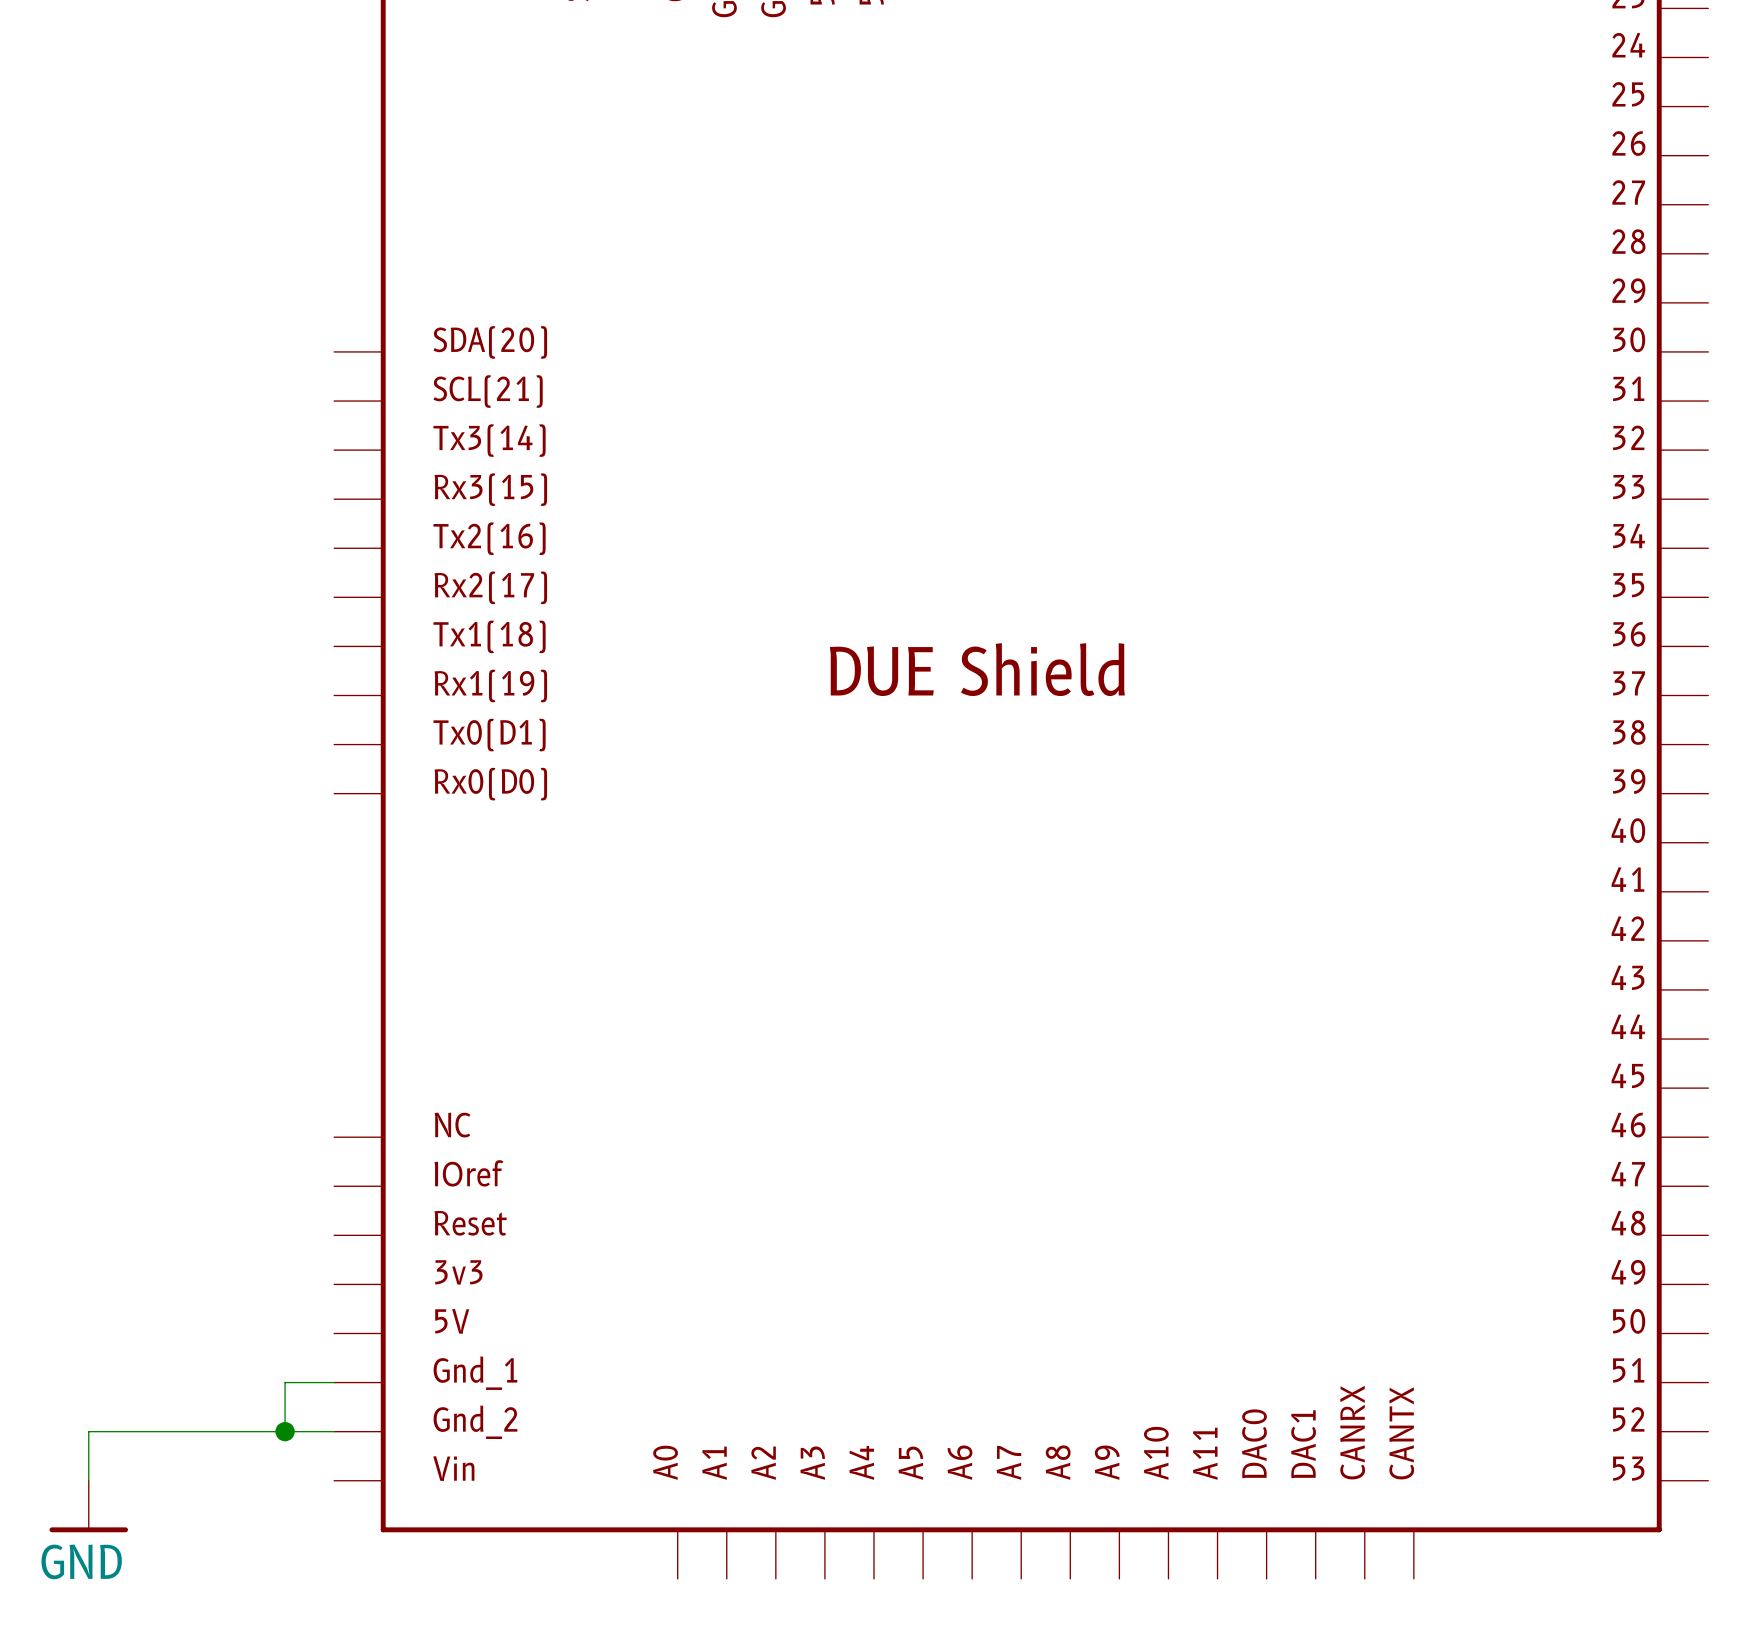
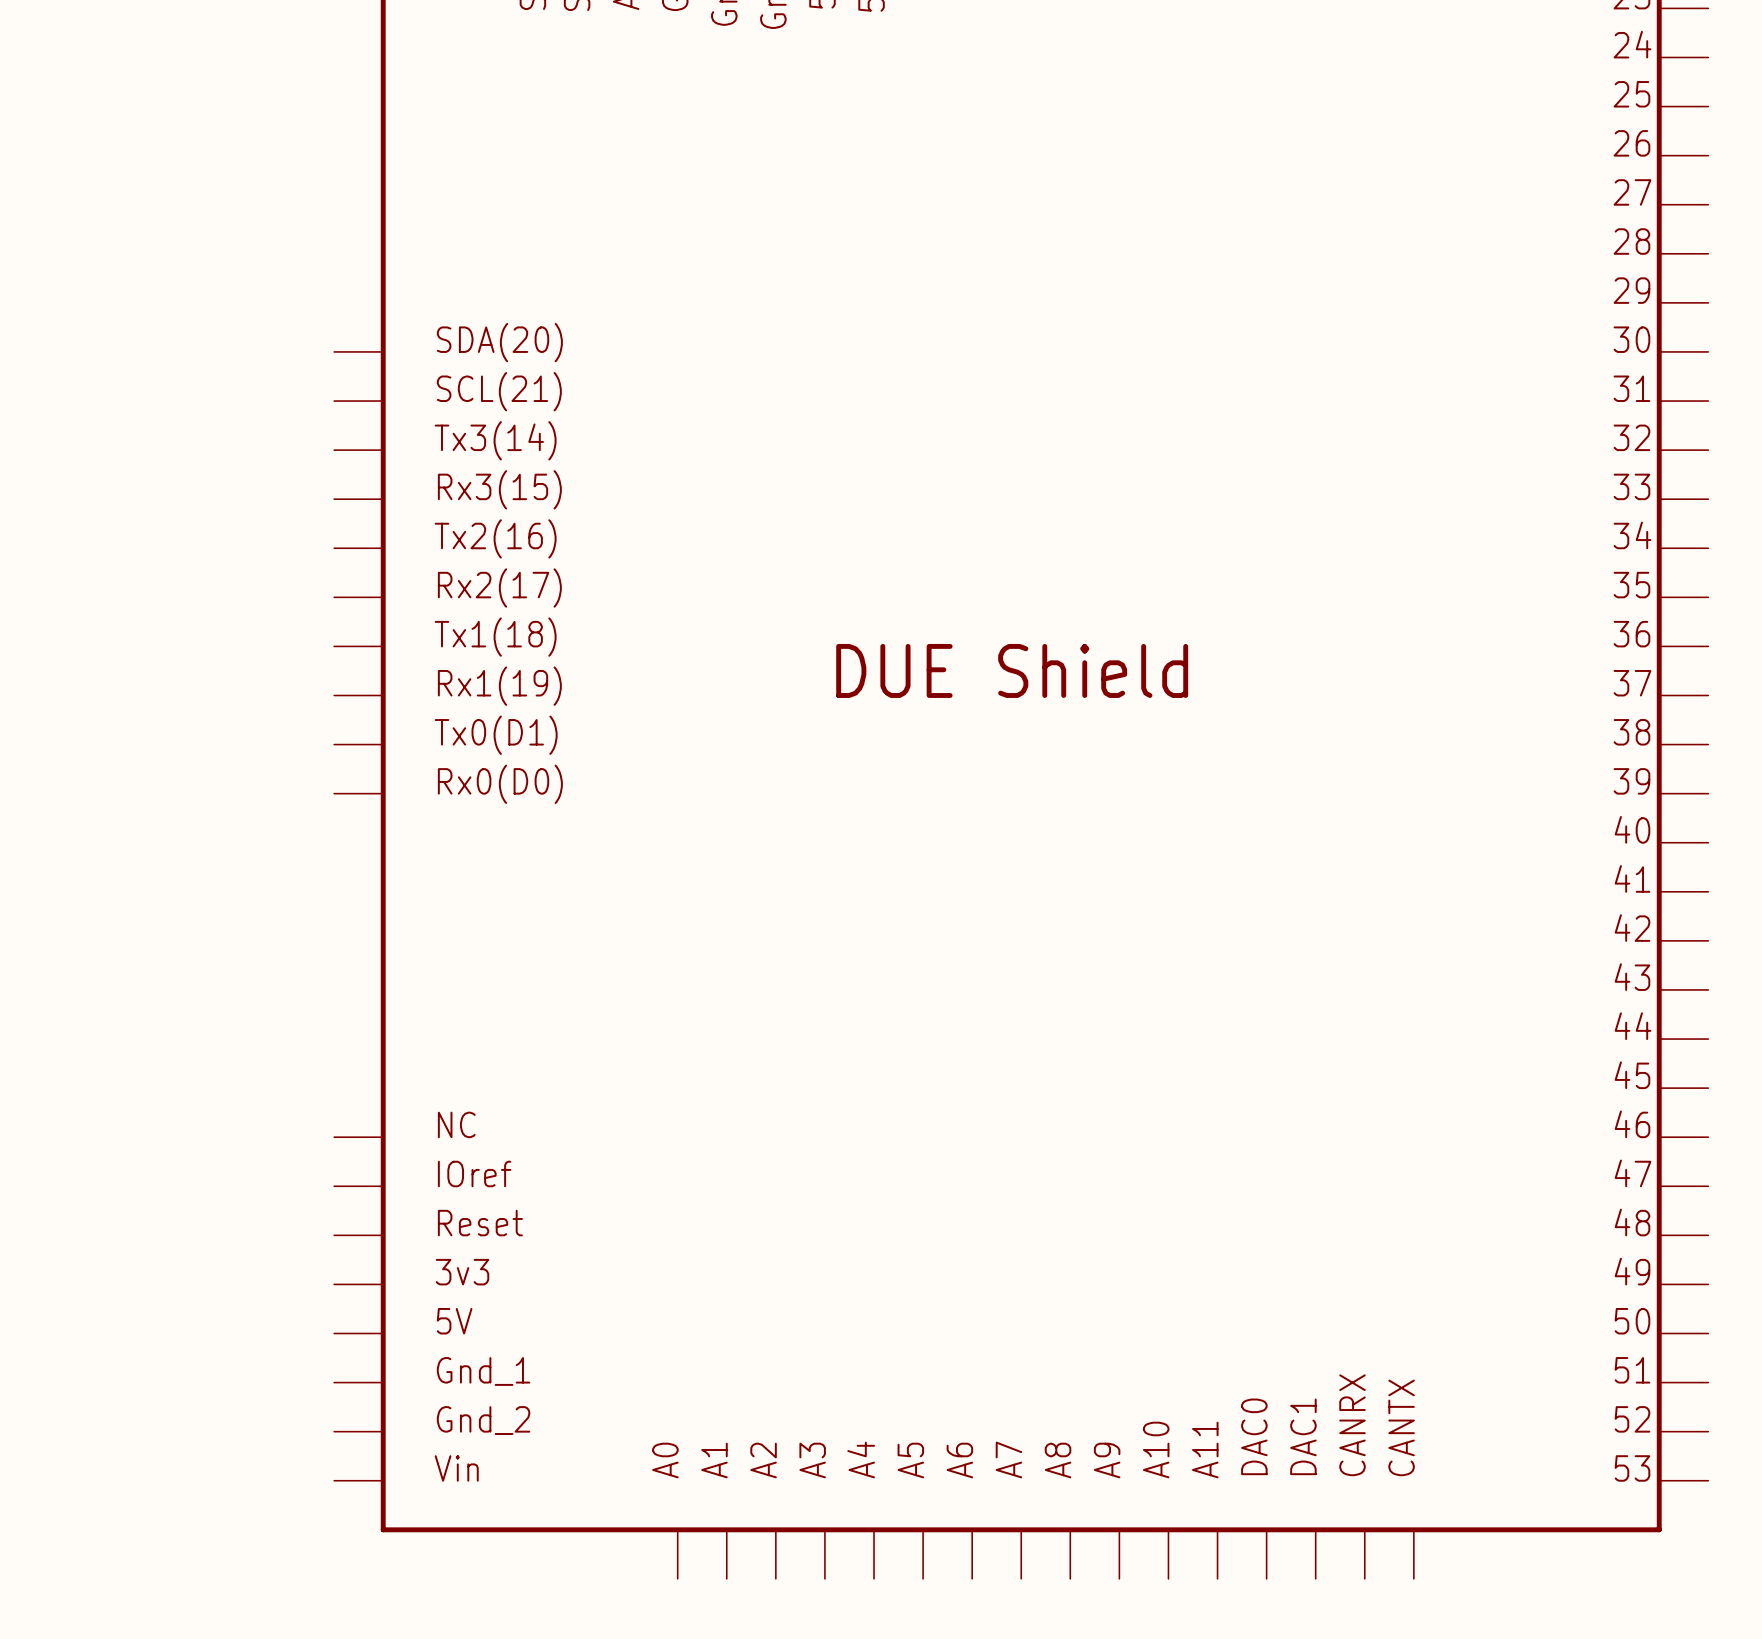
wire: (334, 1382) (285, 1382) (285, 1431) -> none
junction: (285, 1431) -> none
wire: (334, 1431) (88, 1431) (88, 1480) -> none
power symbol: GND (88, 1506) -> none

